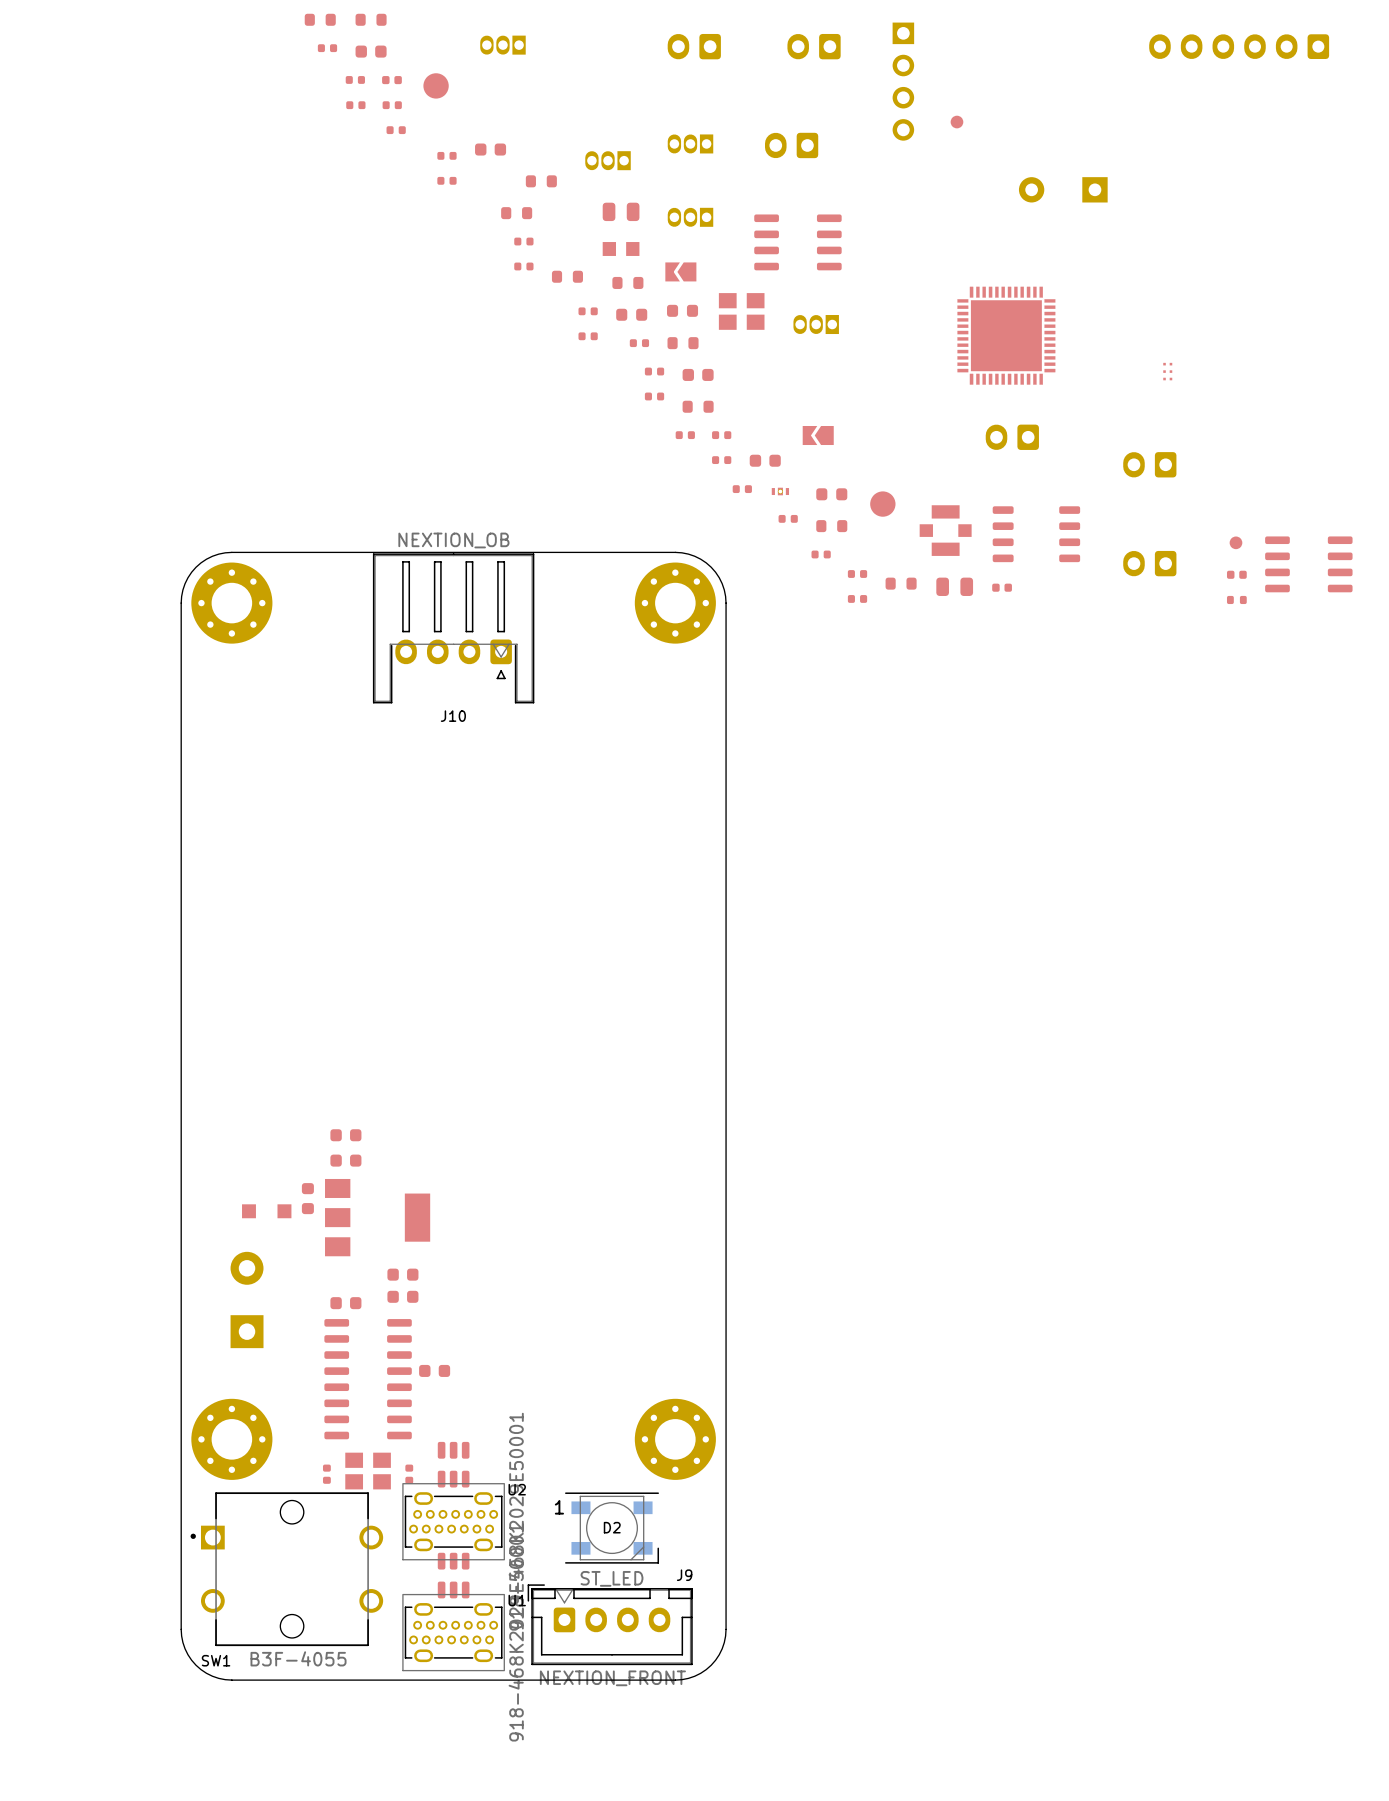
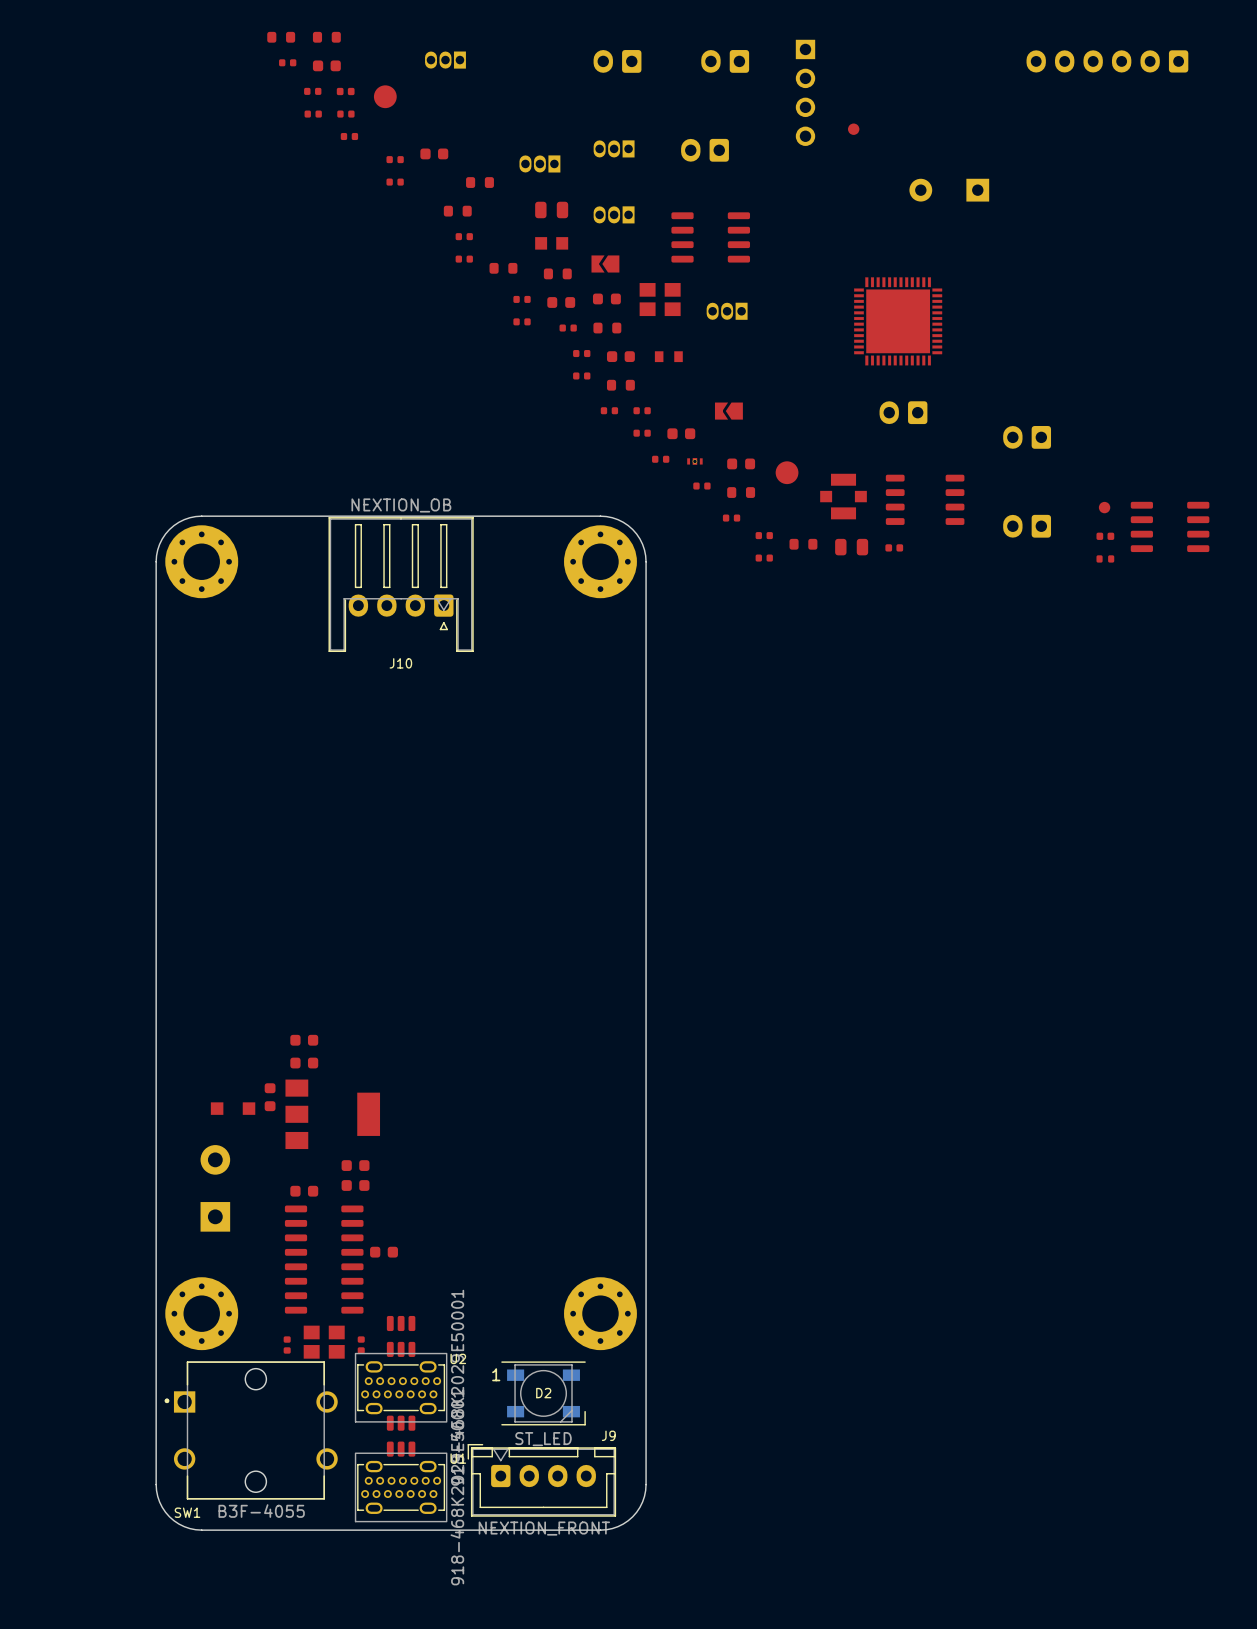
part: (1167, 371) -> none
part: none -> (668, 356)

